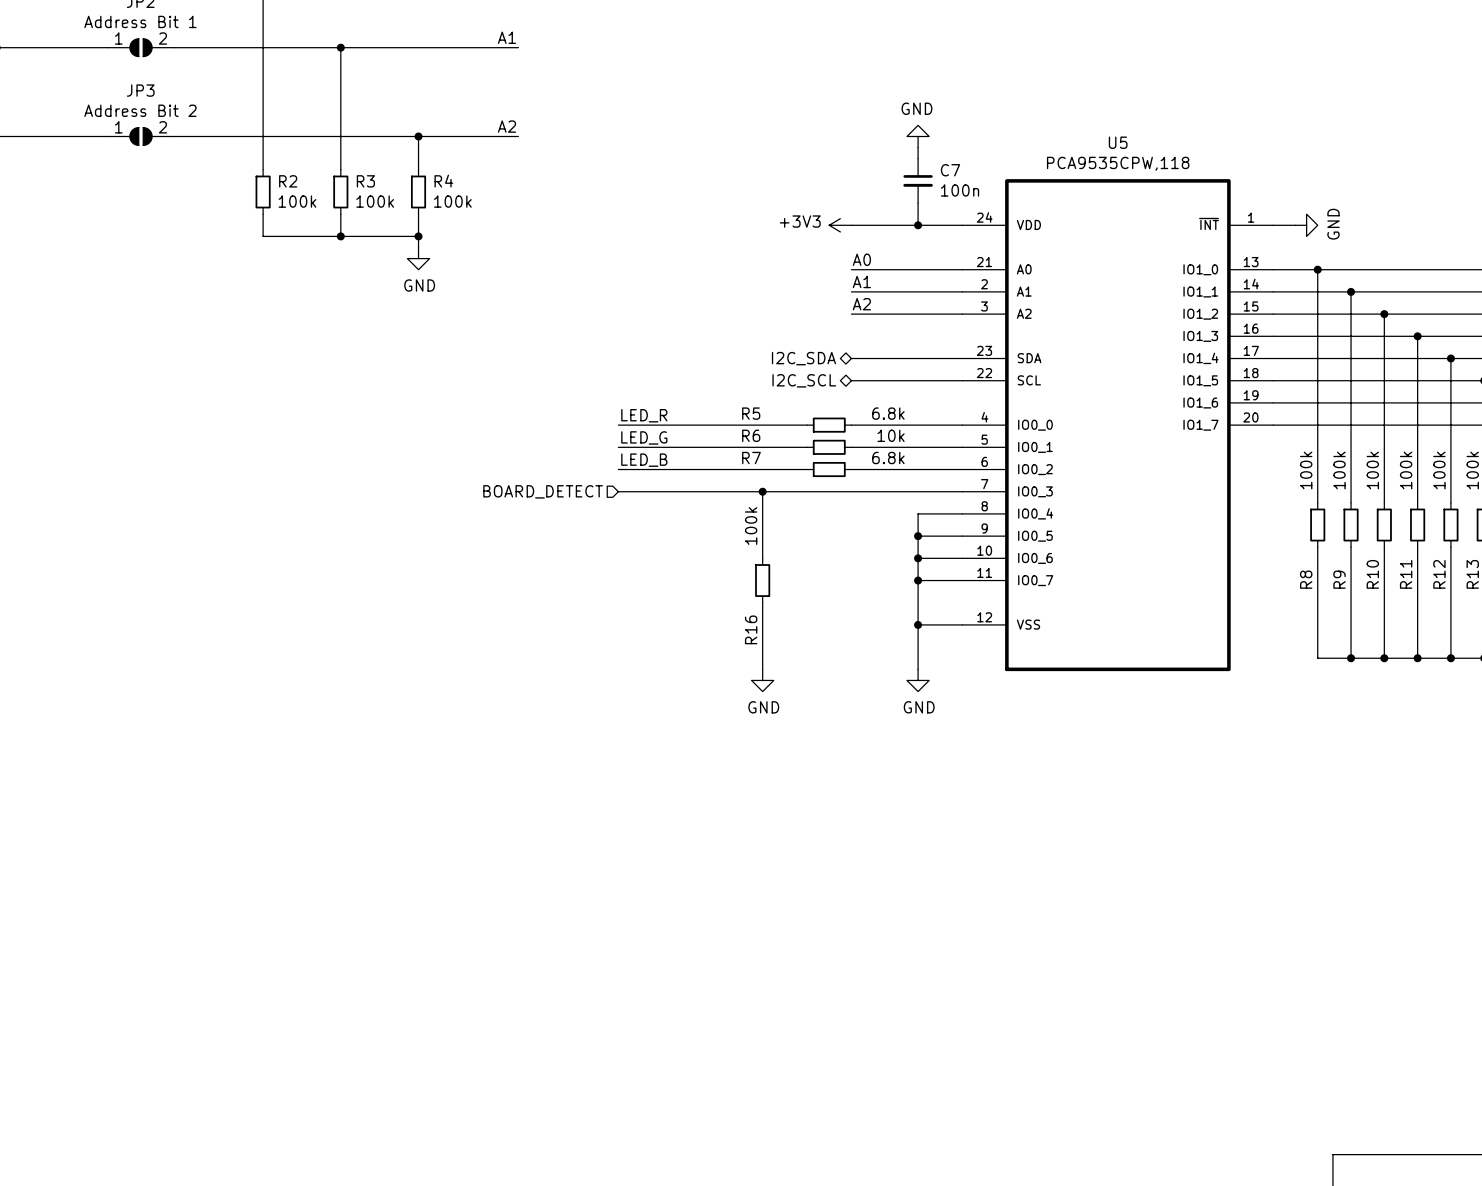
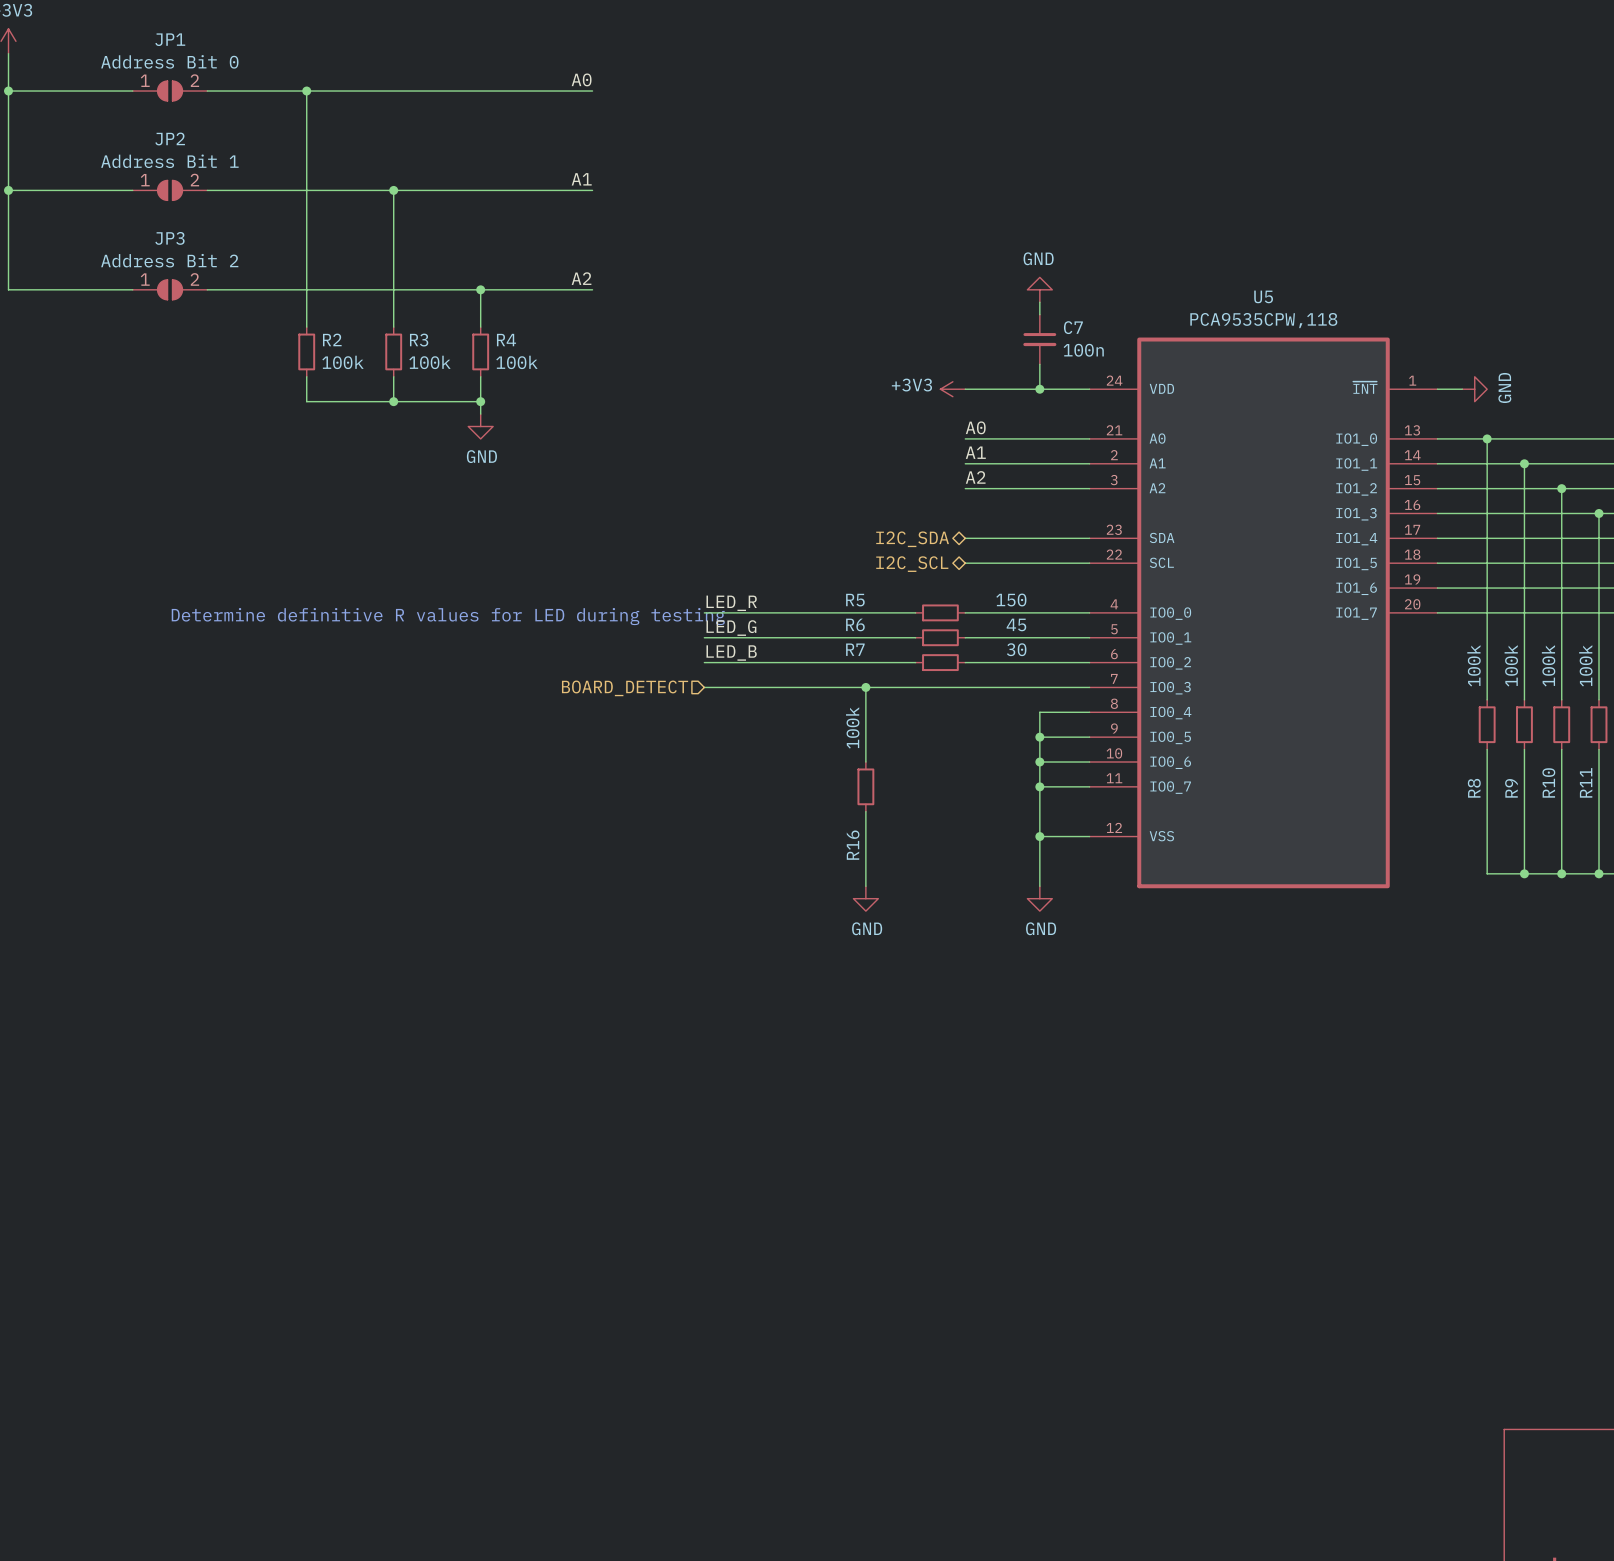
R5 value: 6.8k (888, 413) -> 150 (1011, 600)
text: none -> Determine definitive R values for LED during testing (448, 616)
R6 value: 10k (891, 435) -> 45 (1016, 624)
R7 value: 6.8k (888, 458) -> 30 (1016, 649)

